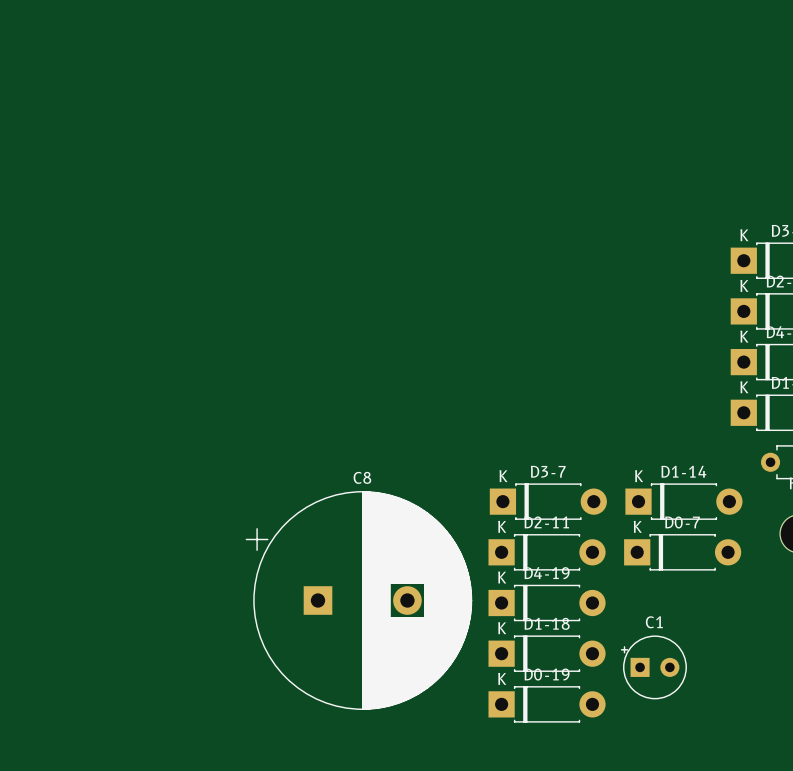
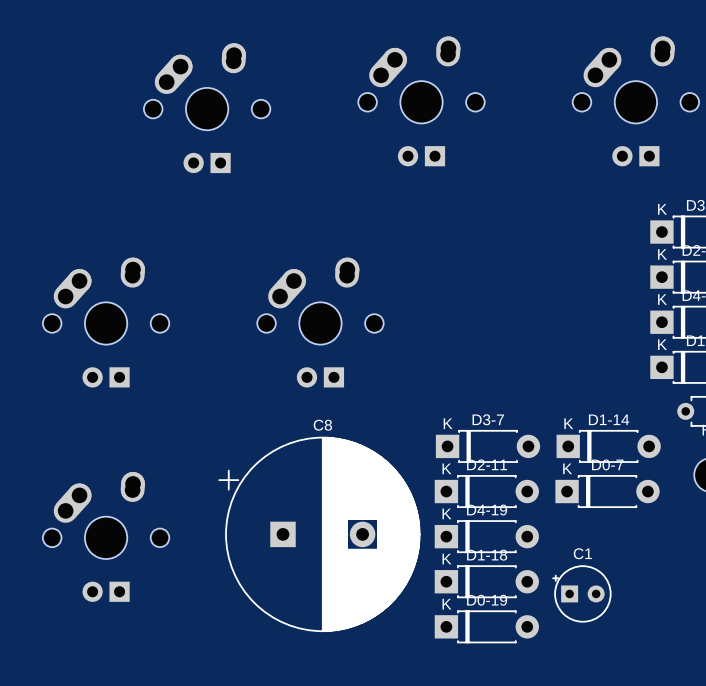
part: none -> (421, 101)
part: none -> (635, 101)
part: none -> (207, 108)
part: none -> (106, 322)
part: none -> (320, 322)
part: none -> (106, 536)

